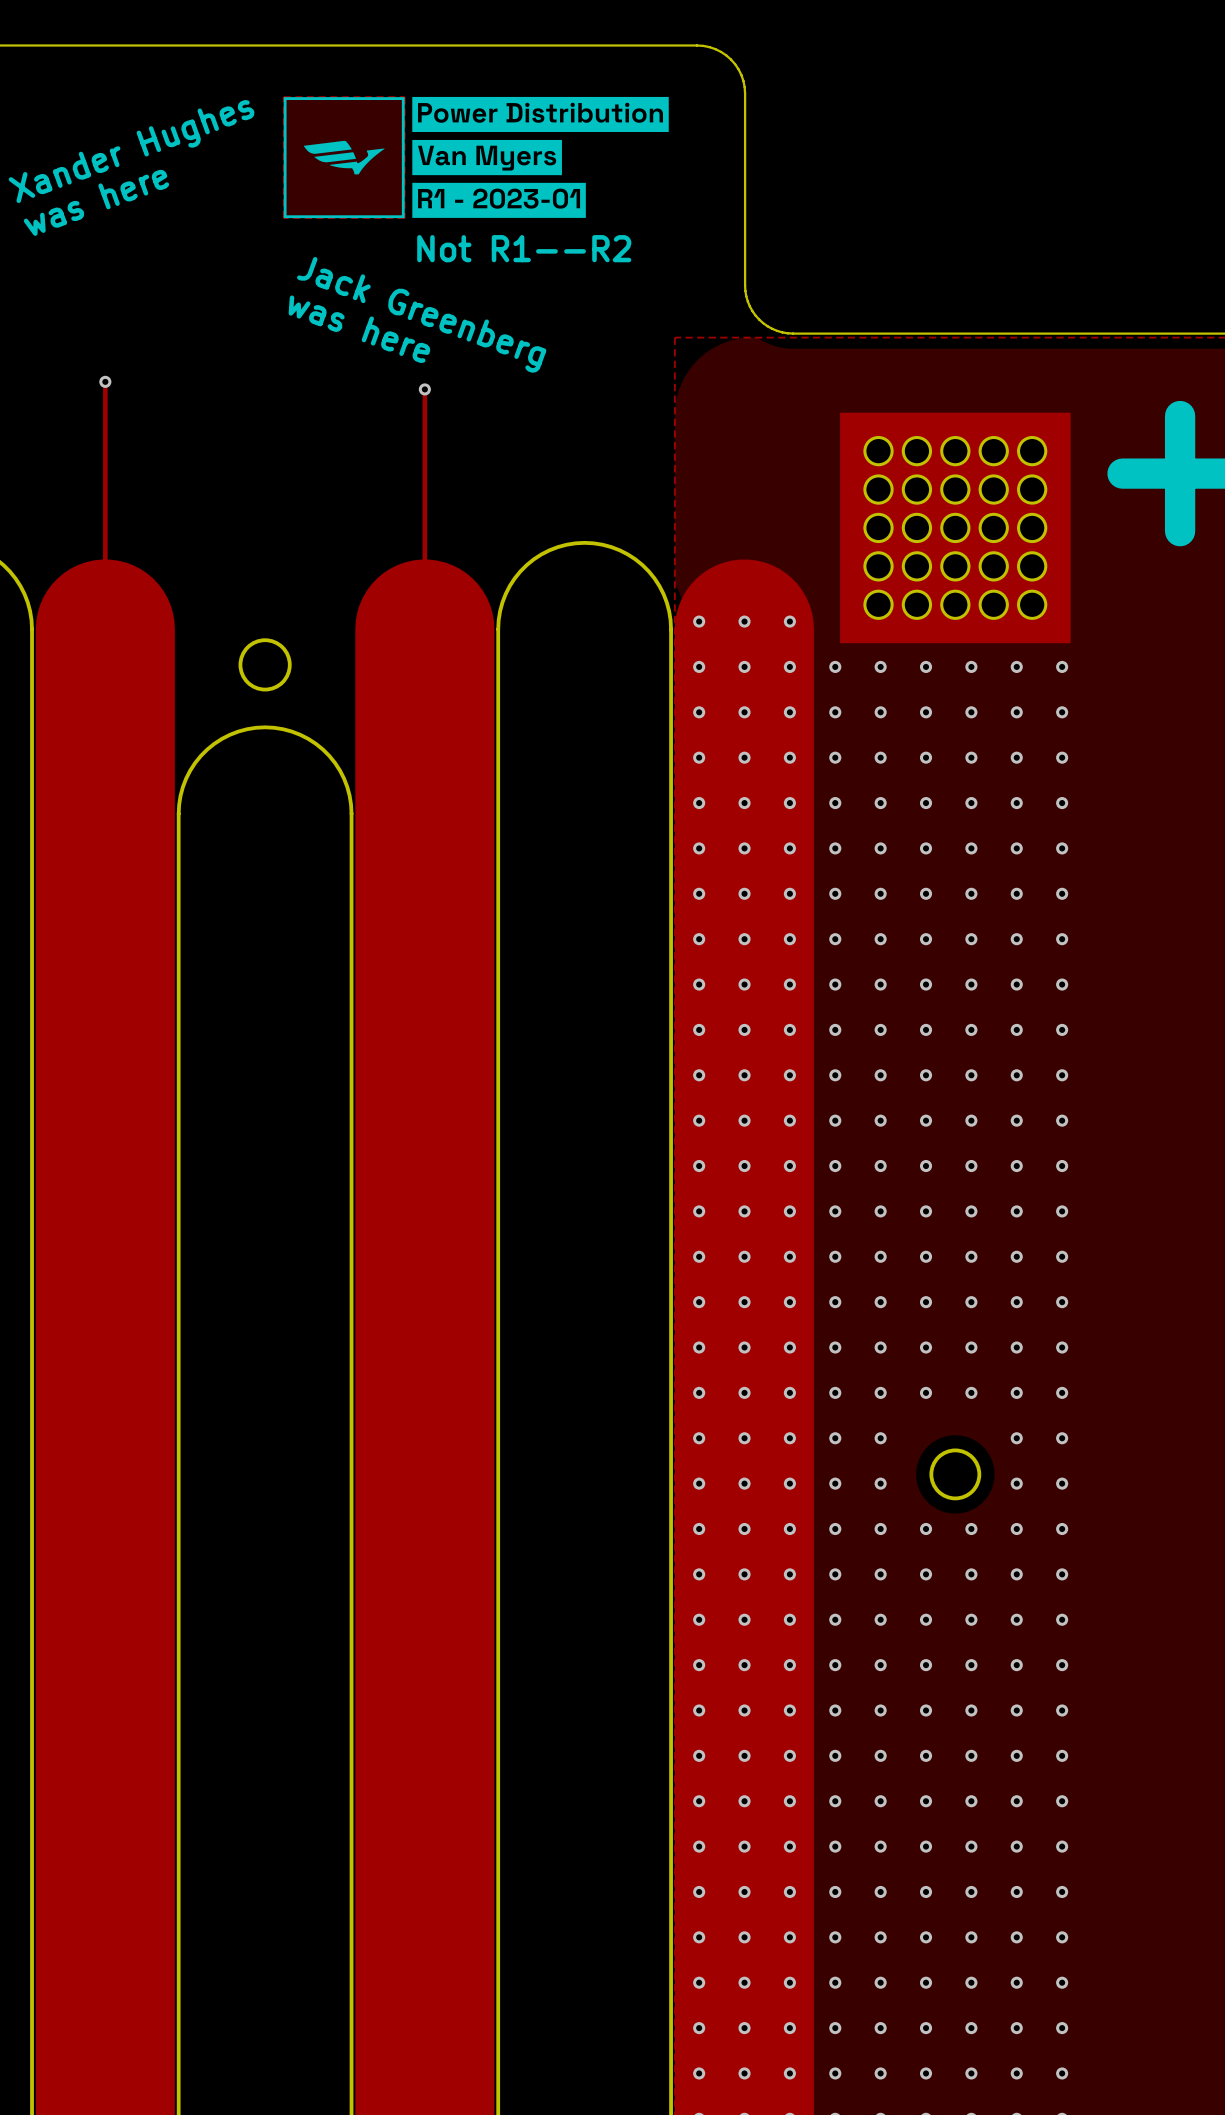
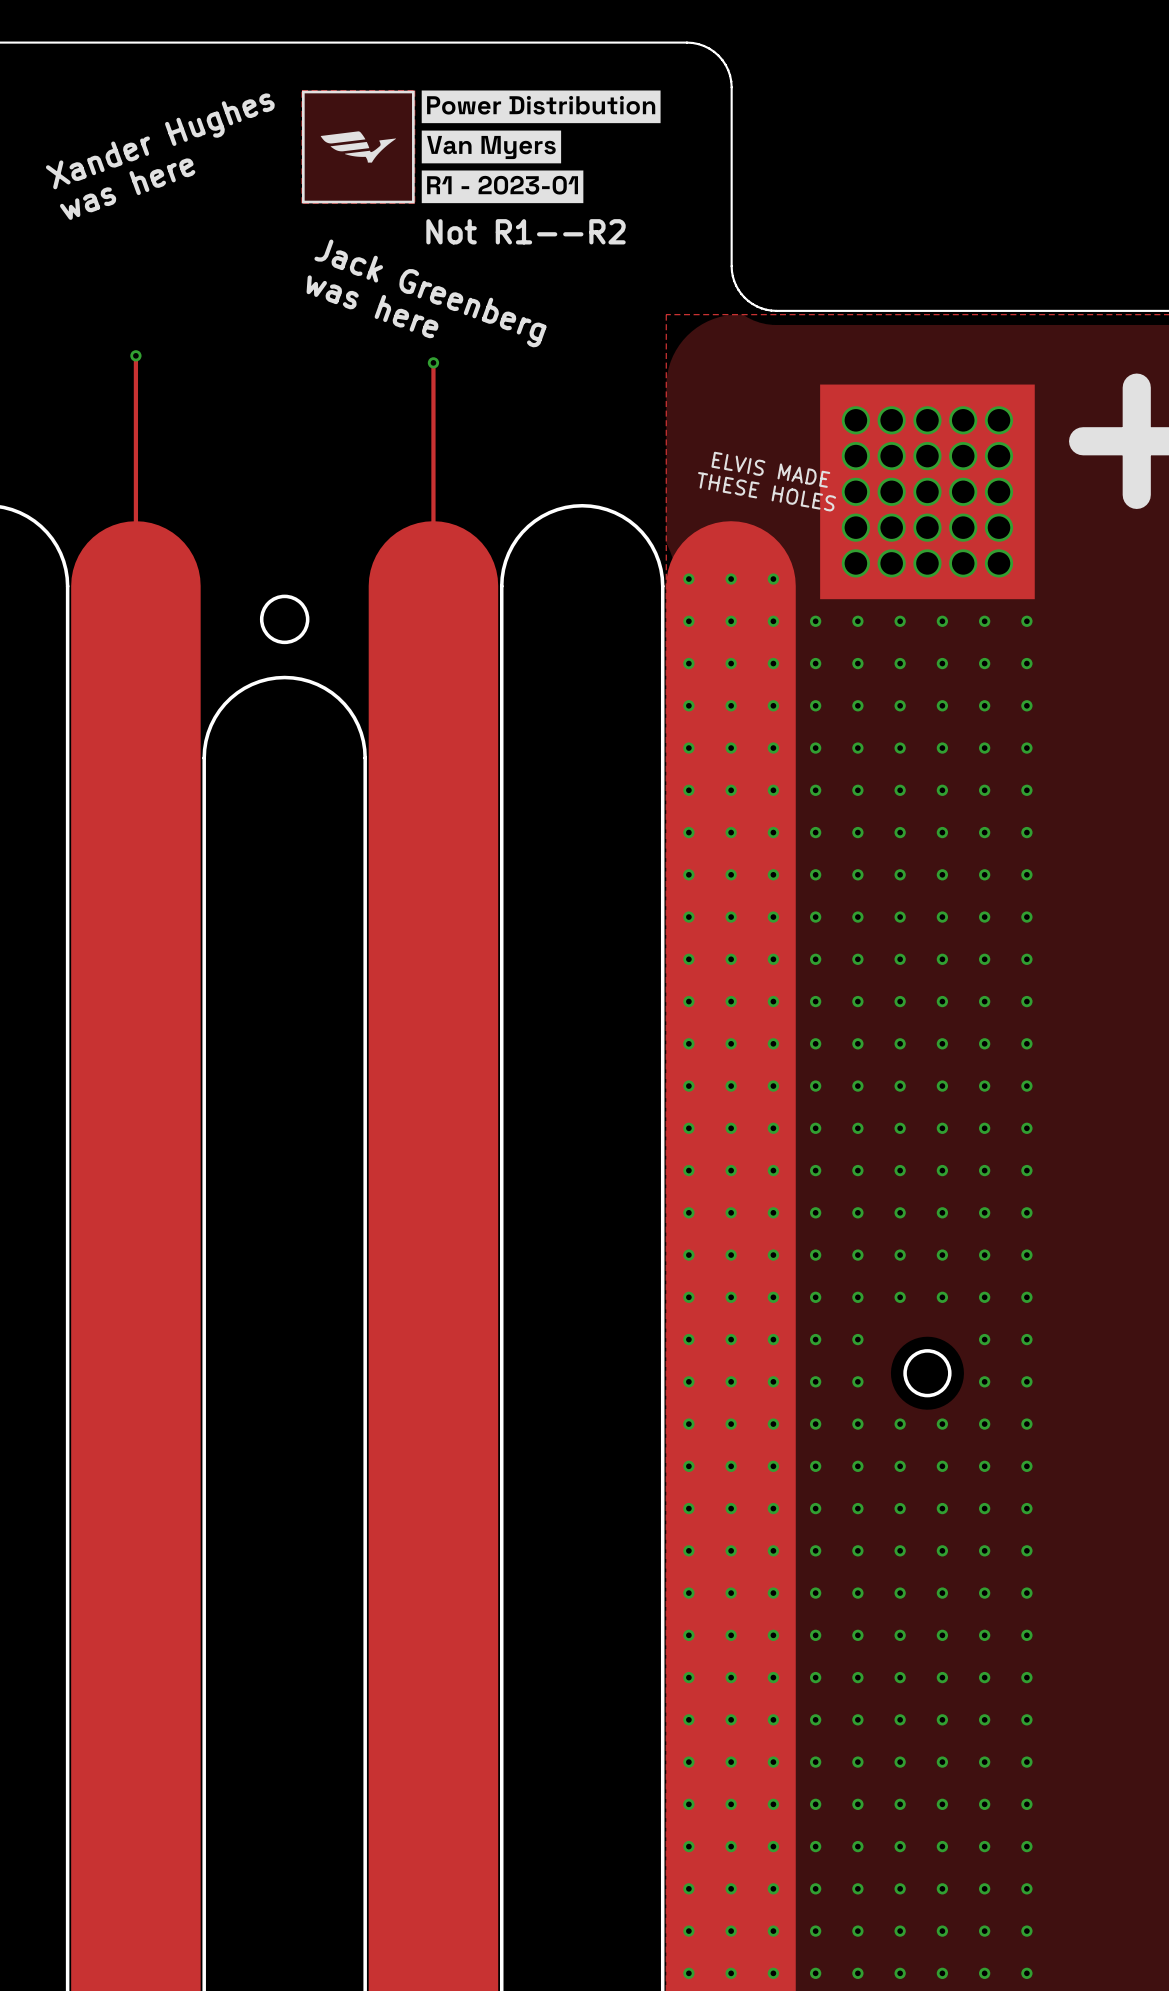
text: none -> ELVIS MADE (770, 469)
text: none -> THESE HOLES (767, 491)

